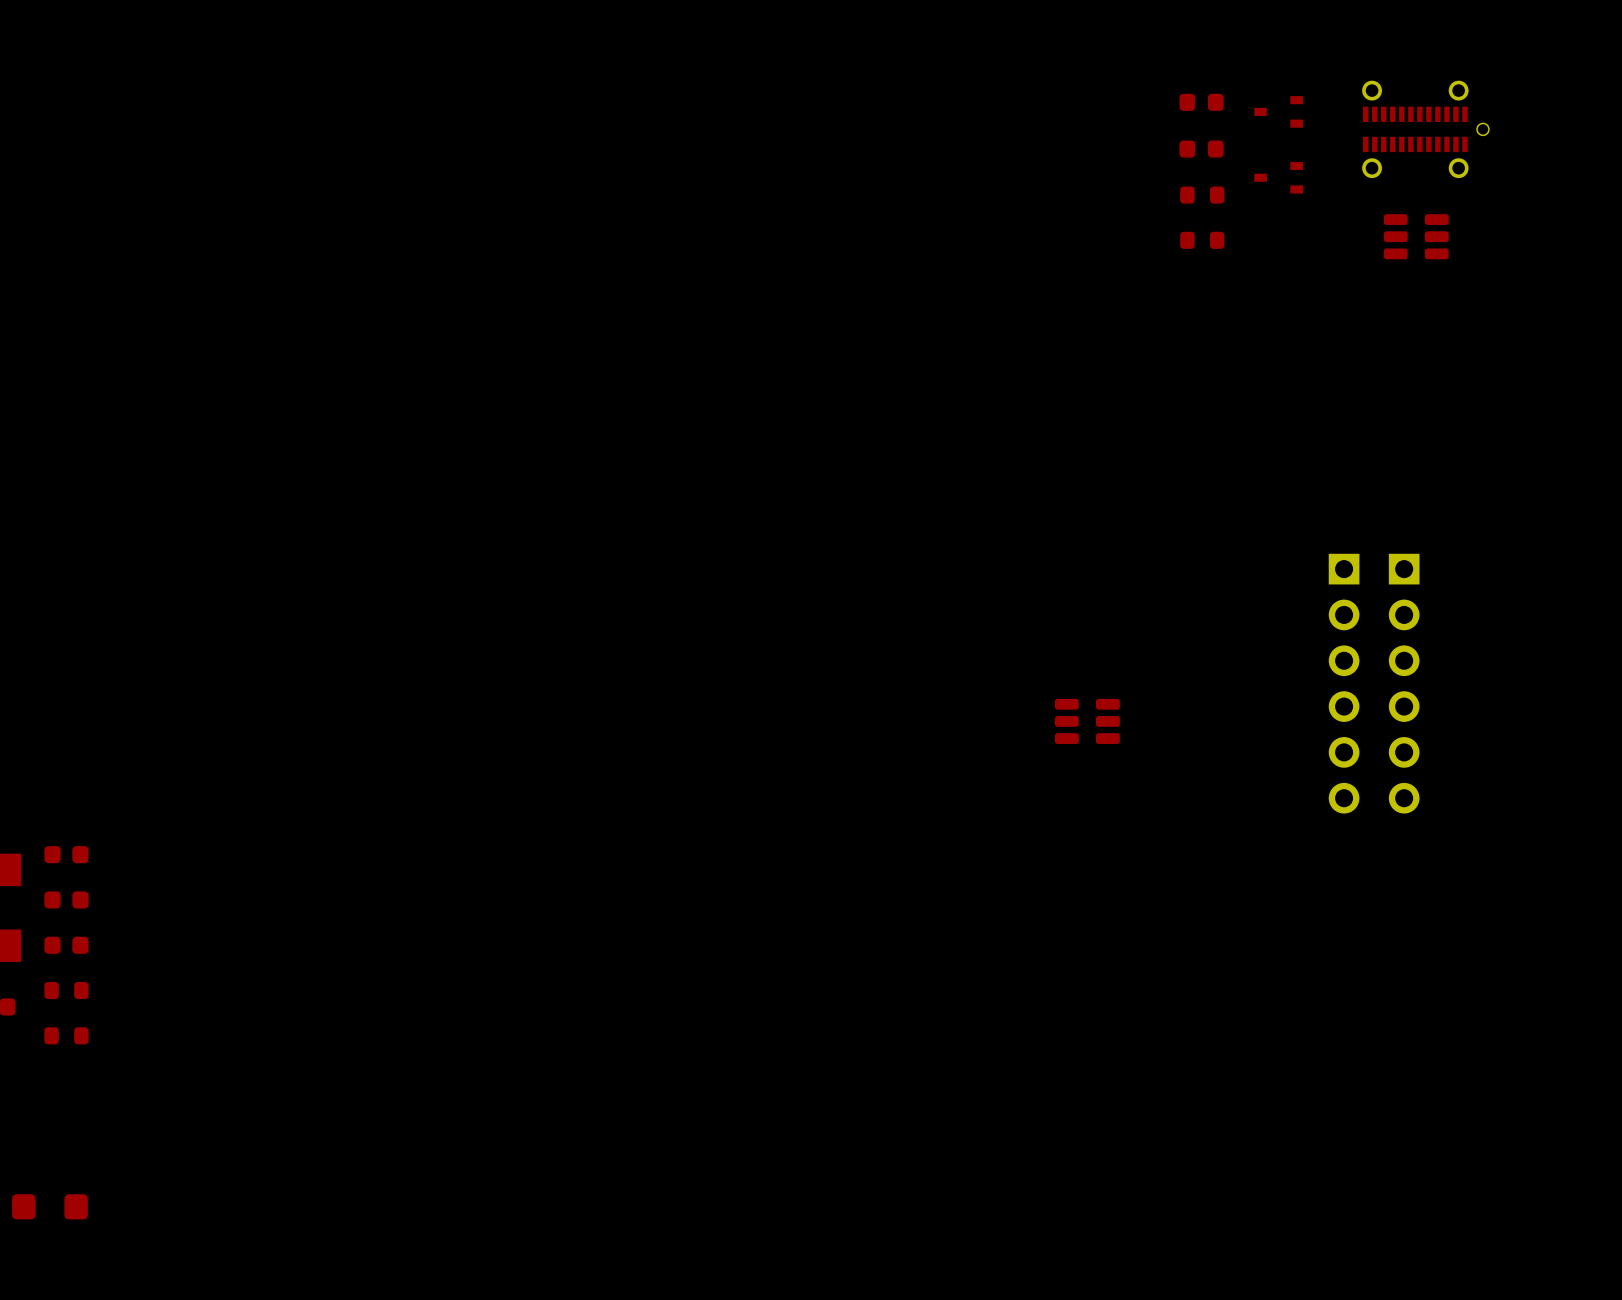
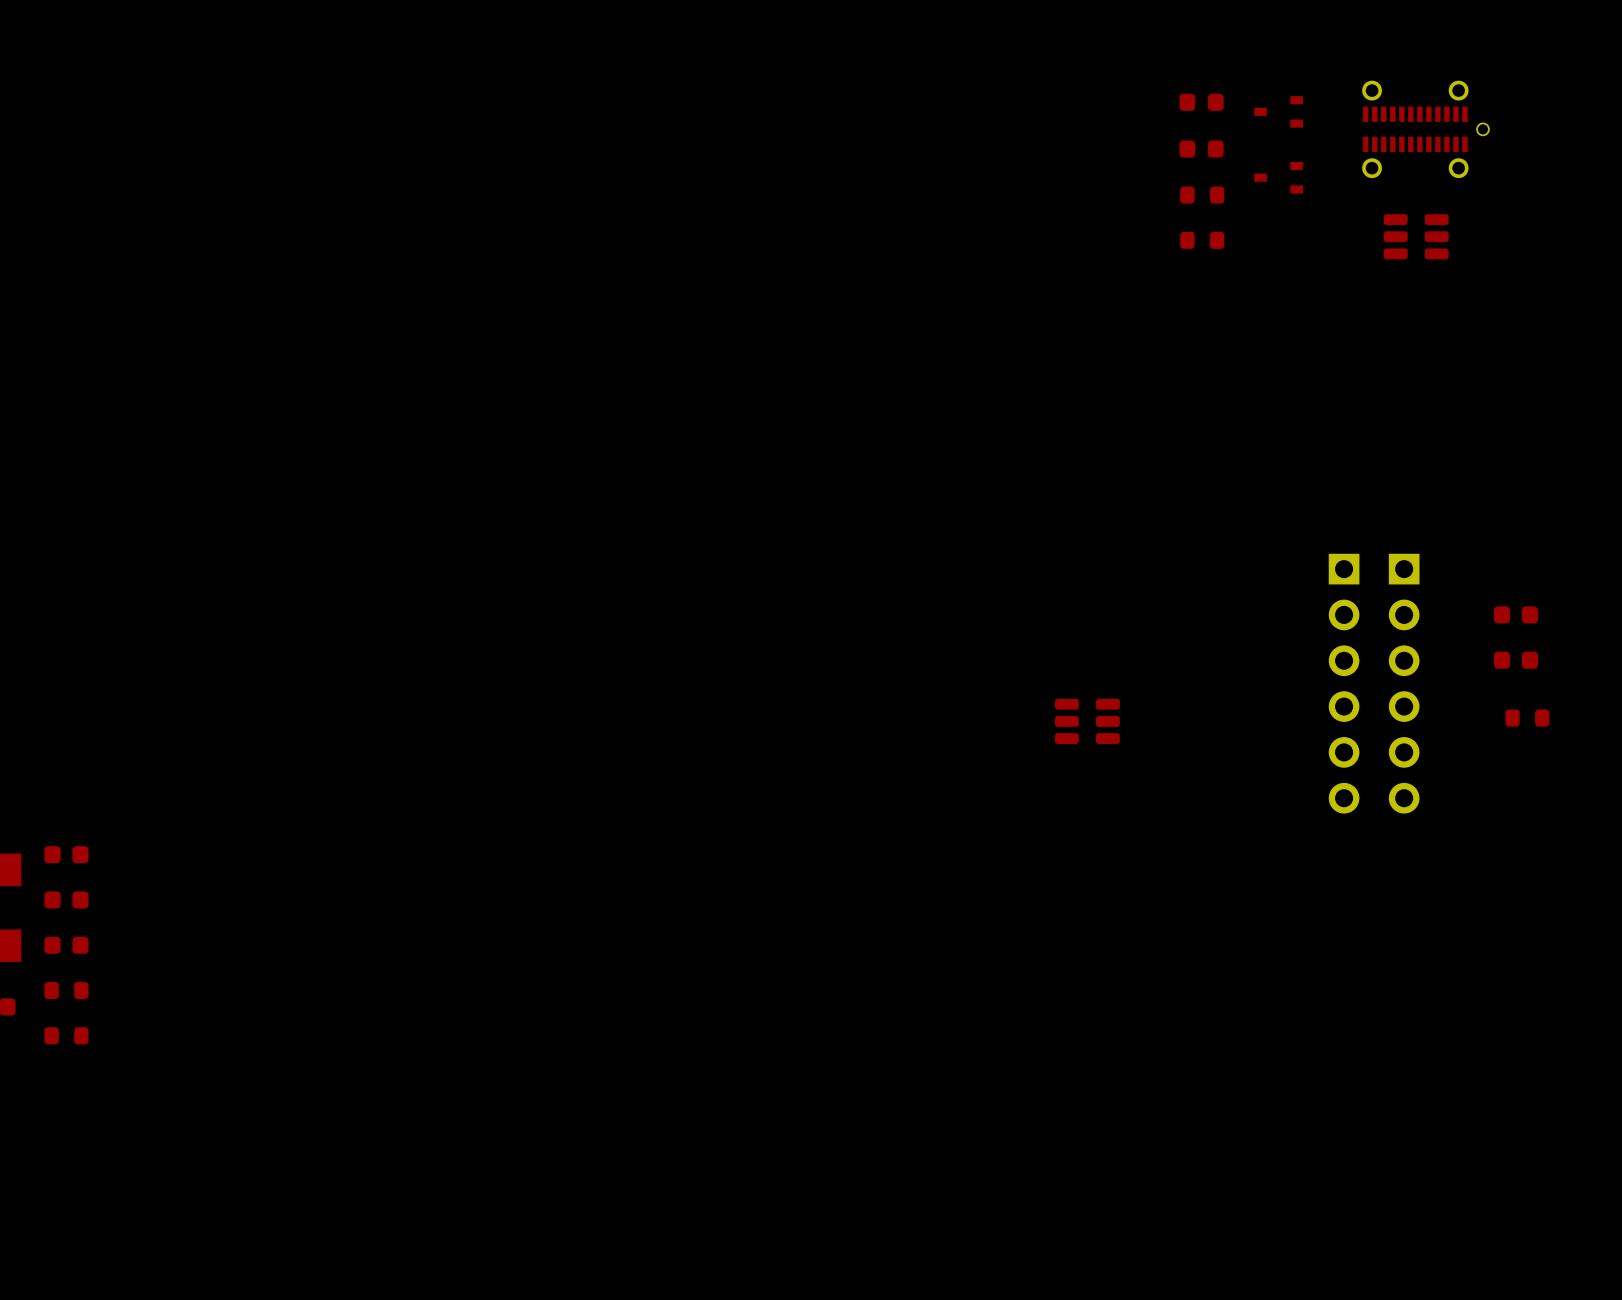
part: none -> (1515, 614)
part: none -> (1515, 660)
part: none -> (1527, 718)
part: (49, 1206) -> none

